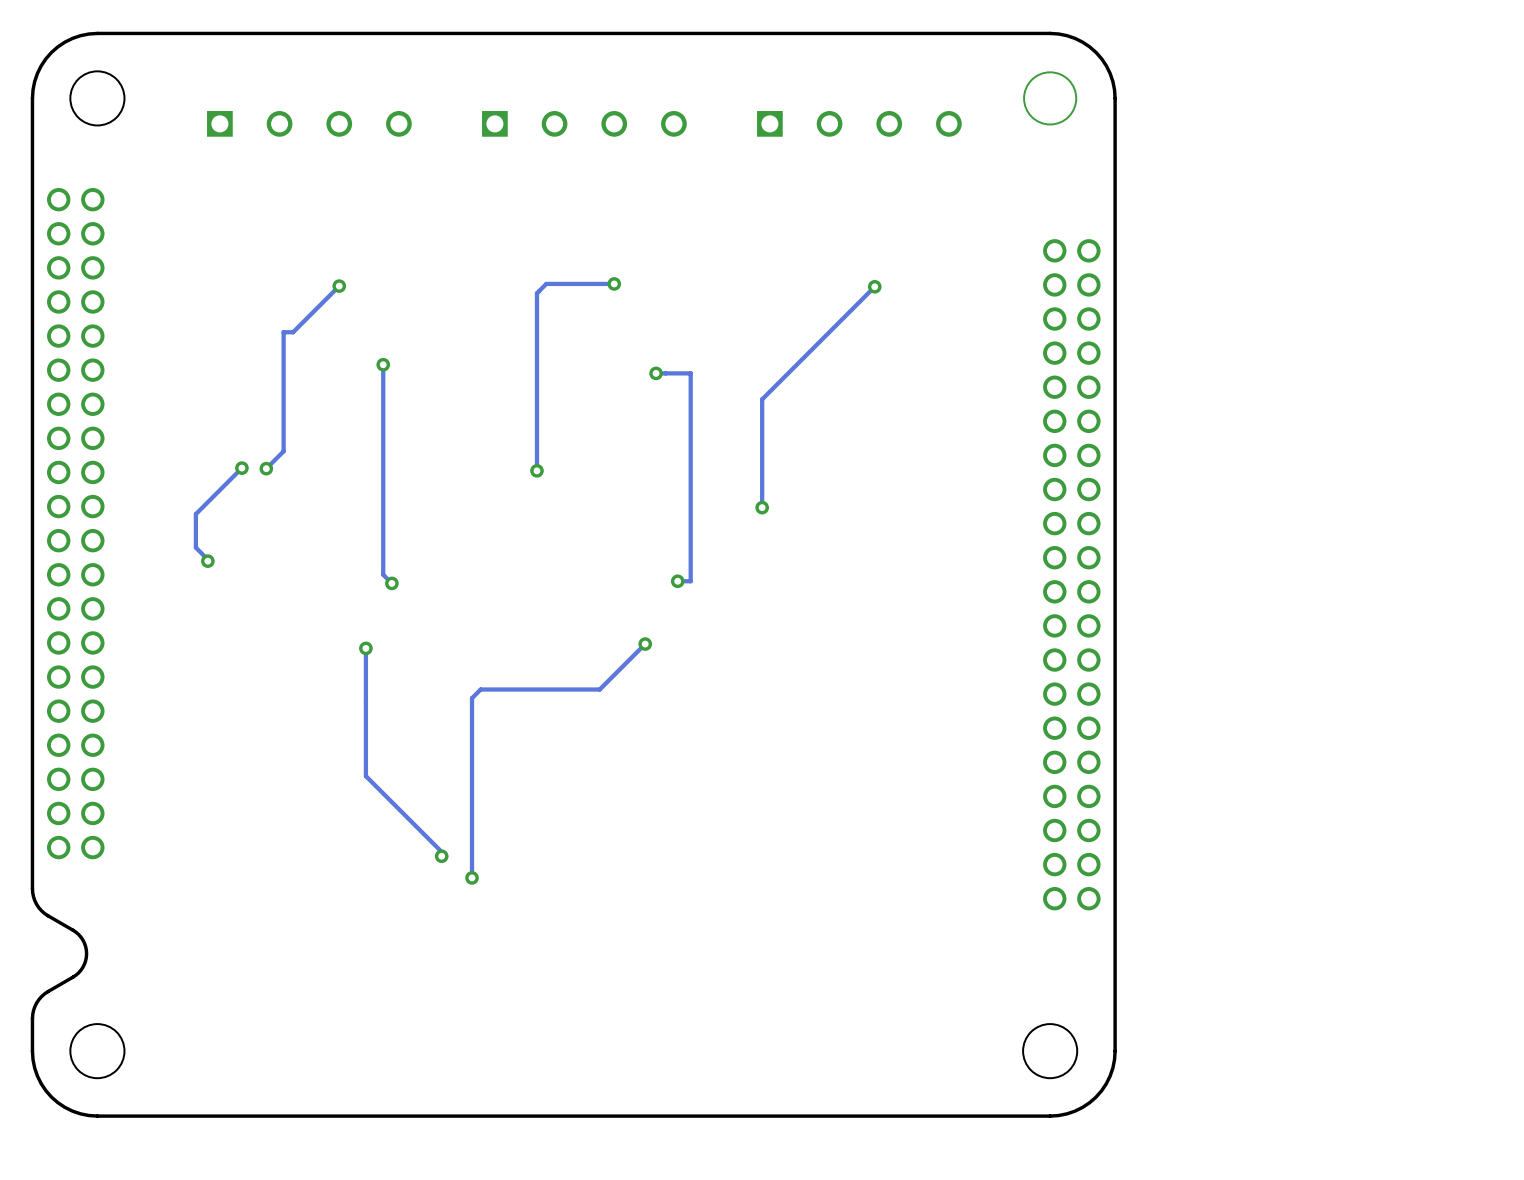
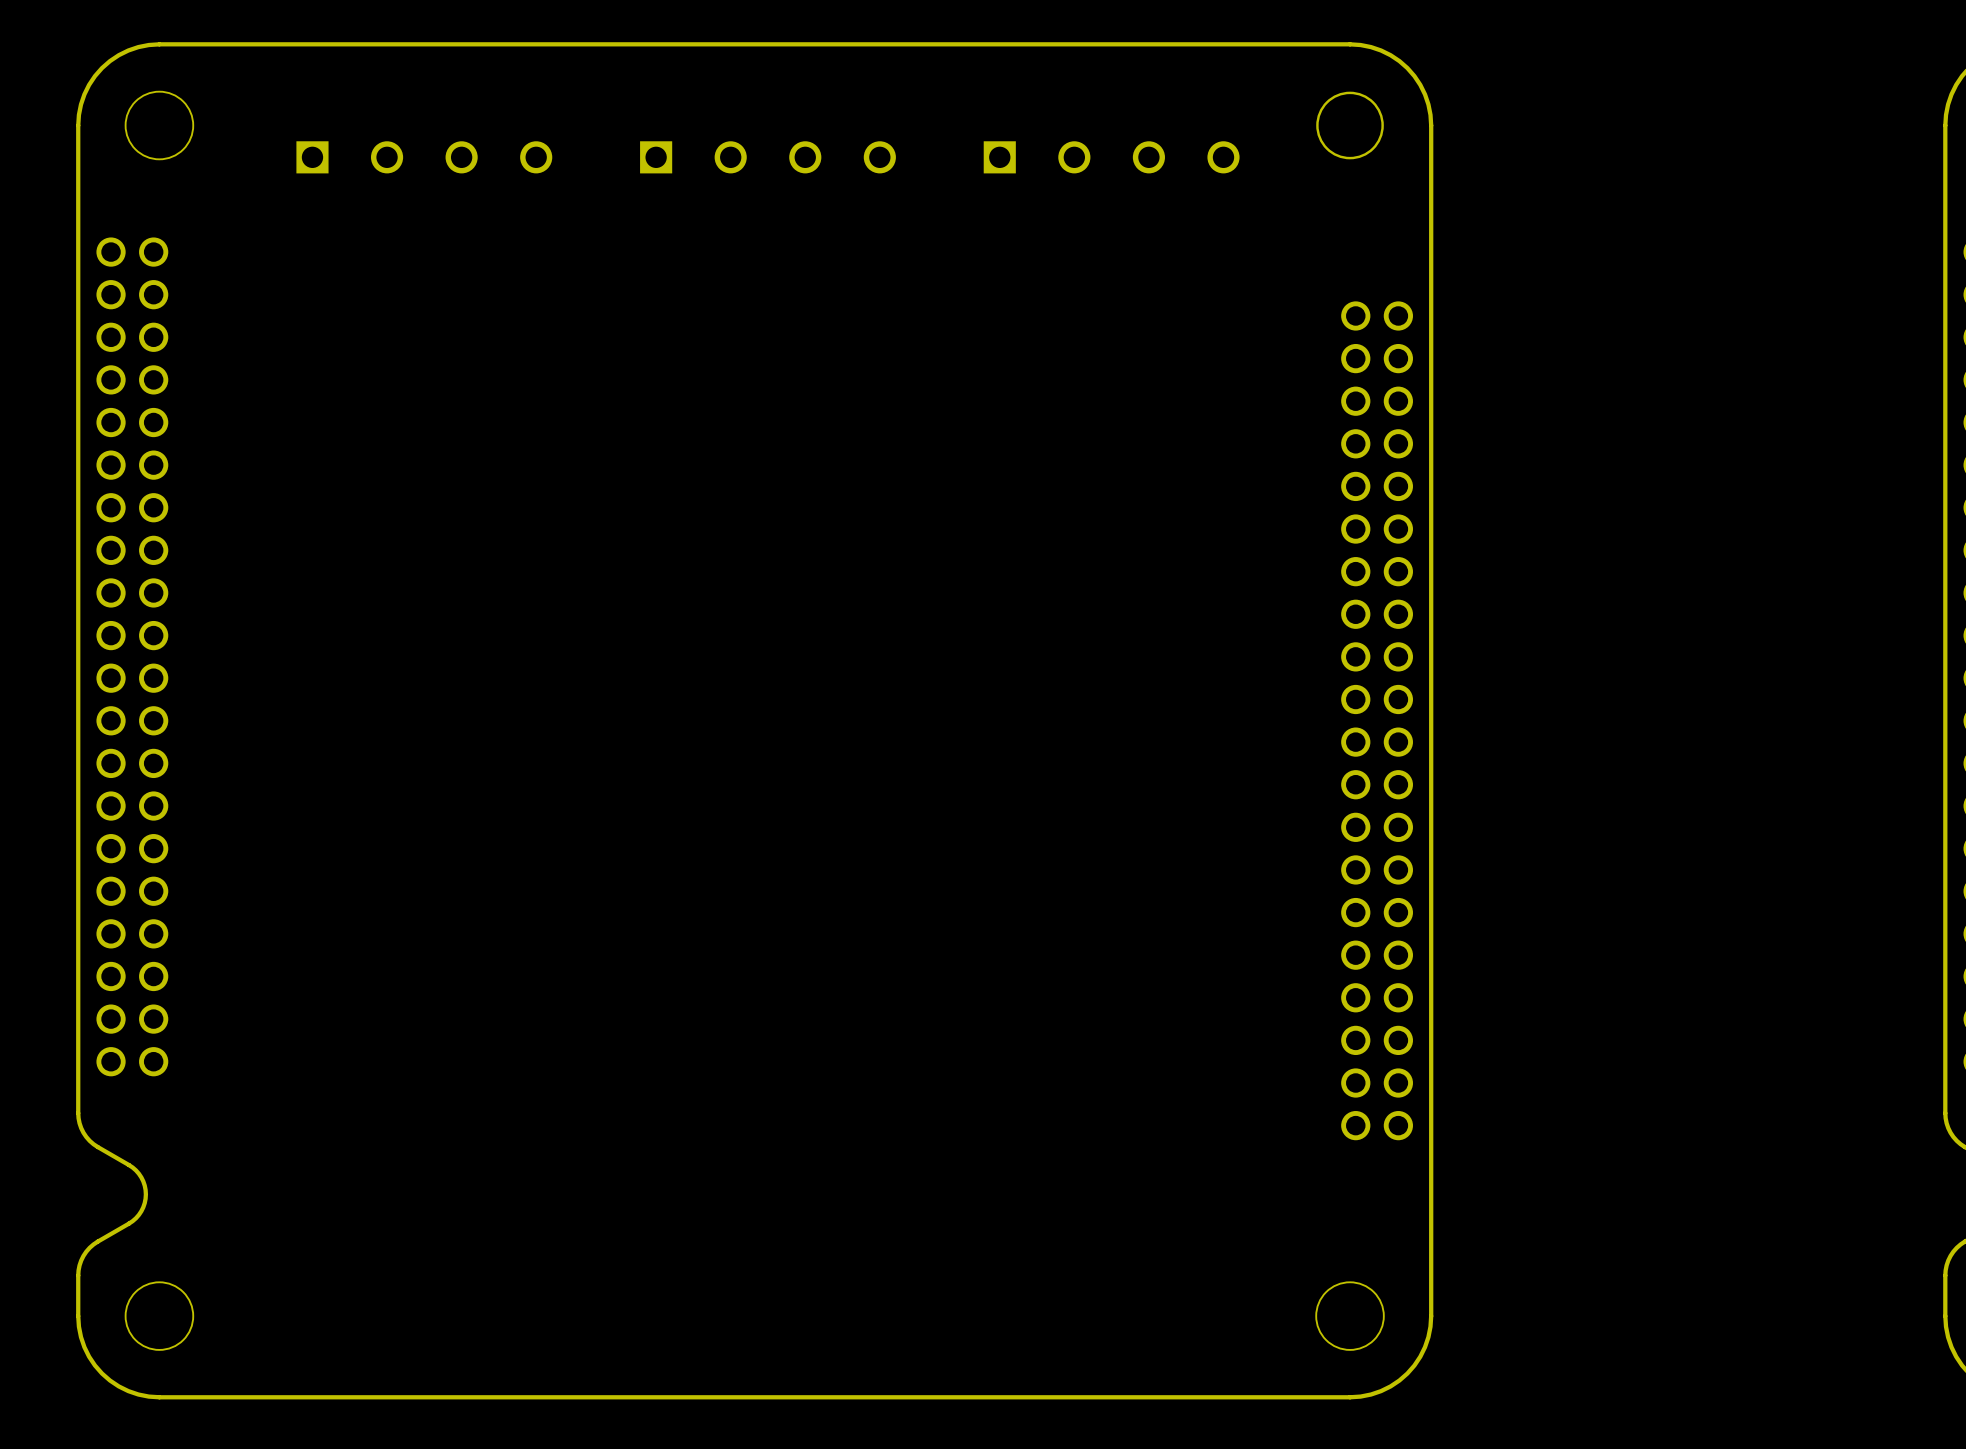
track: (614, 283) (546, 283) (536, 293) (536, 470) -> none
via: (614, 283) -> none
track: (339, 286) (293, 332) (283, 332) (283, 451) (266, 468) -> none
via: (339, 286) -> none
track: (874, 286) (762, 399) (762, 507) -> none
via: (874, 286) -> none
track: (383, 364) (383, 574) (391, 583) -> none
via: (383, 364) -> none
track: (656, 373) (690, 373) (690, 581) (677, 581) -> none
via: (656, 373) -> none
track: (241, 468) (195, 514) (195, 547) (207, 561) -> none
via: (241, 468) -> none
via: (266, 468) -> none
via: (536, 470) -> none
via: (762, 507) -> none
via: (207, 561) -> none
via: (677, 581) -> none
via: (391, 583) -> none
track: (645, 644) (599, 689) (480, 689) (472, 698) (472, 877) -> none
via: (645, 644) -> none
track: (365, 648) (365, 776) (446, 856) (441, 856) -> none
via: (365, 648) -> none
via: (441, 856) -> none
via: (472, 877) -> none

